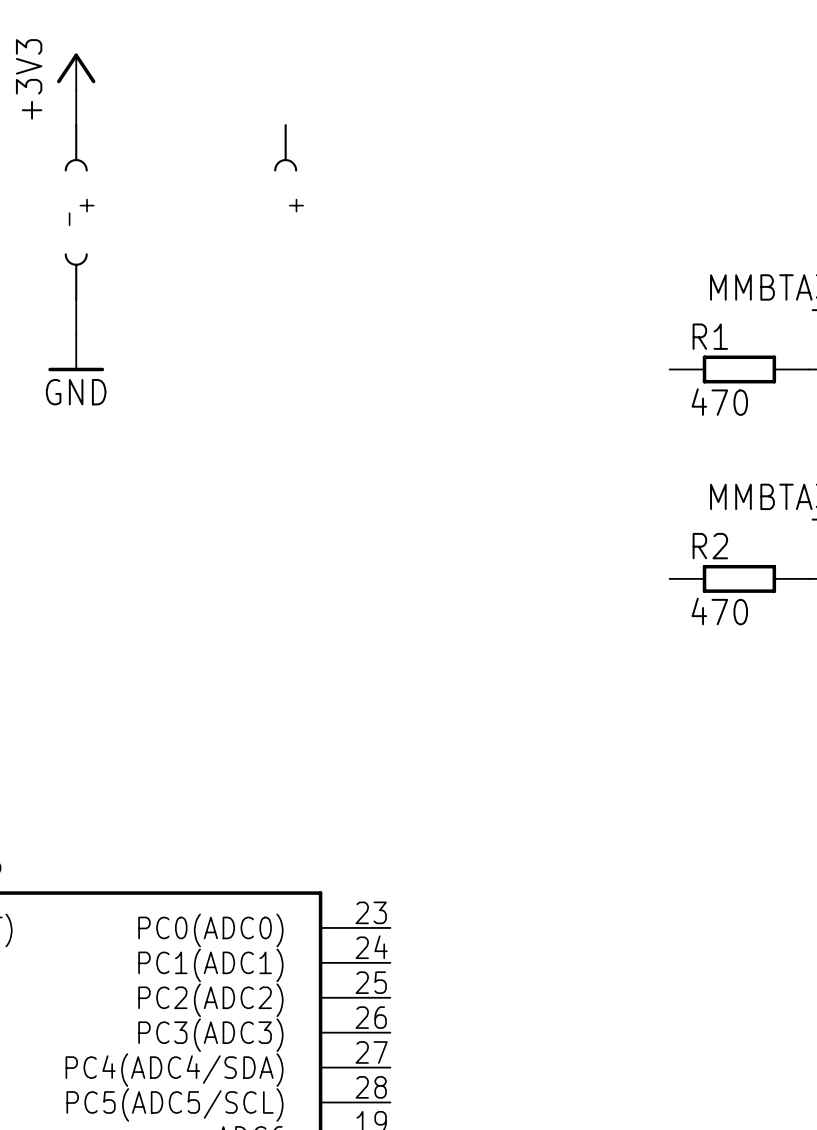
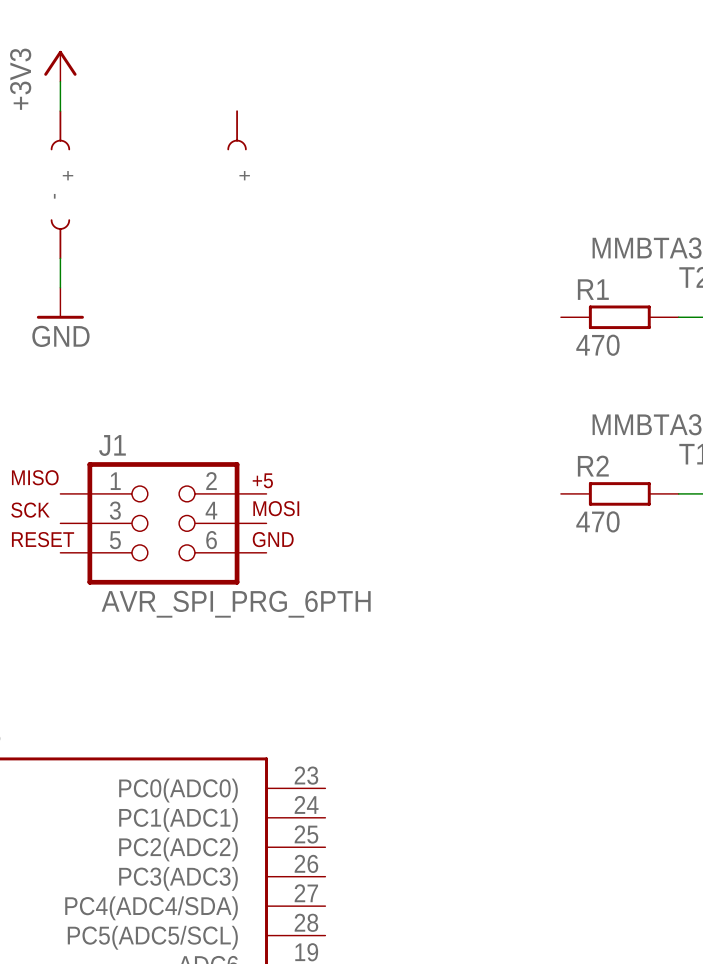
J1: none -> AVR_SPI_PRG_6PTH (163, 523)

